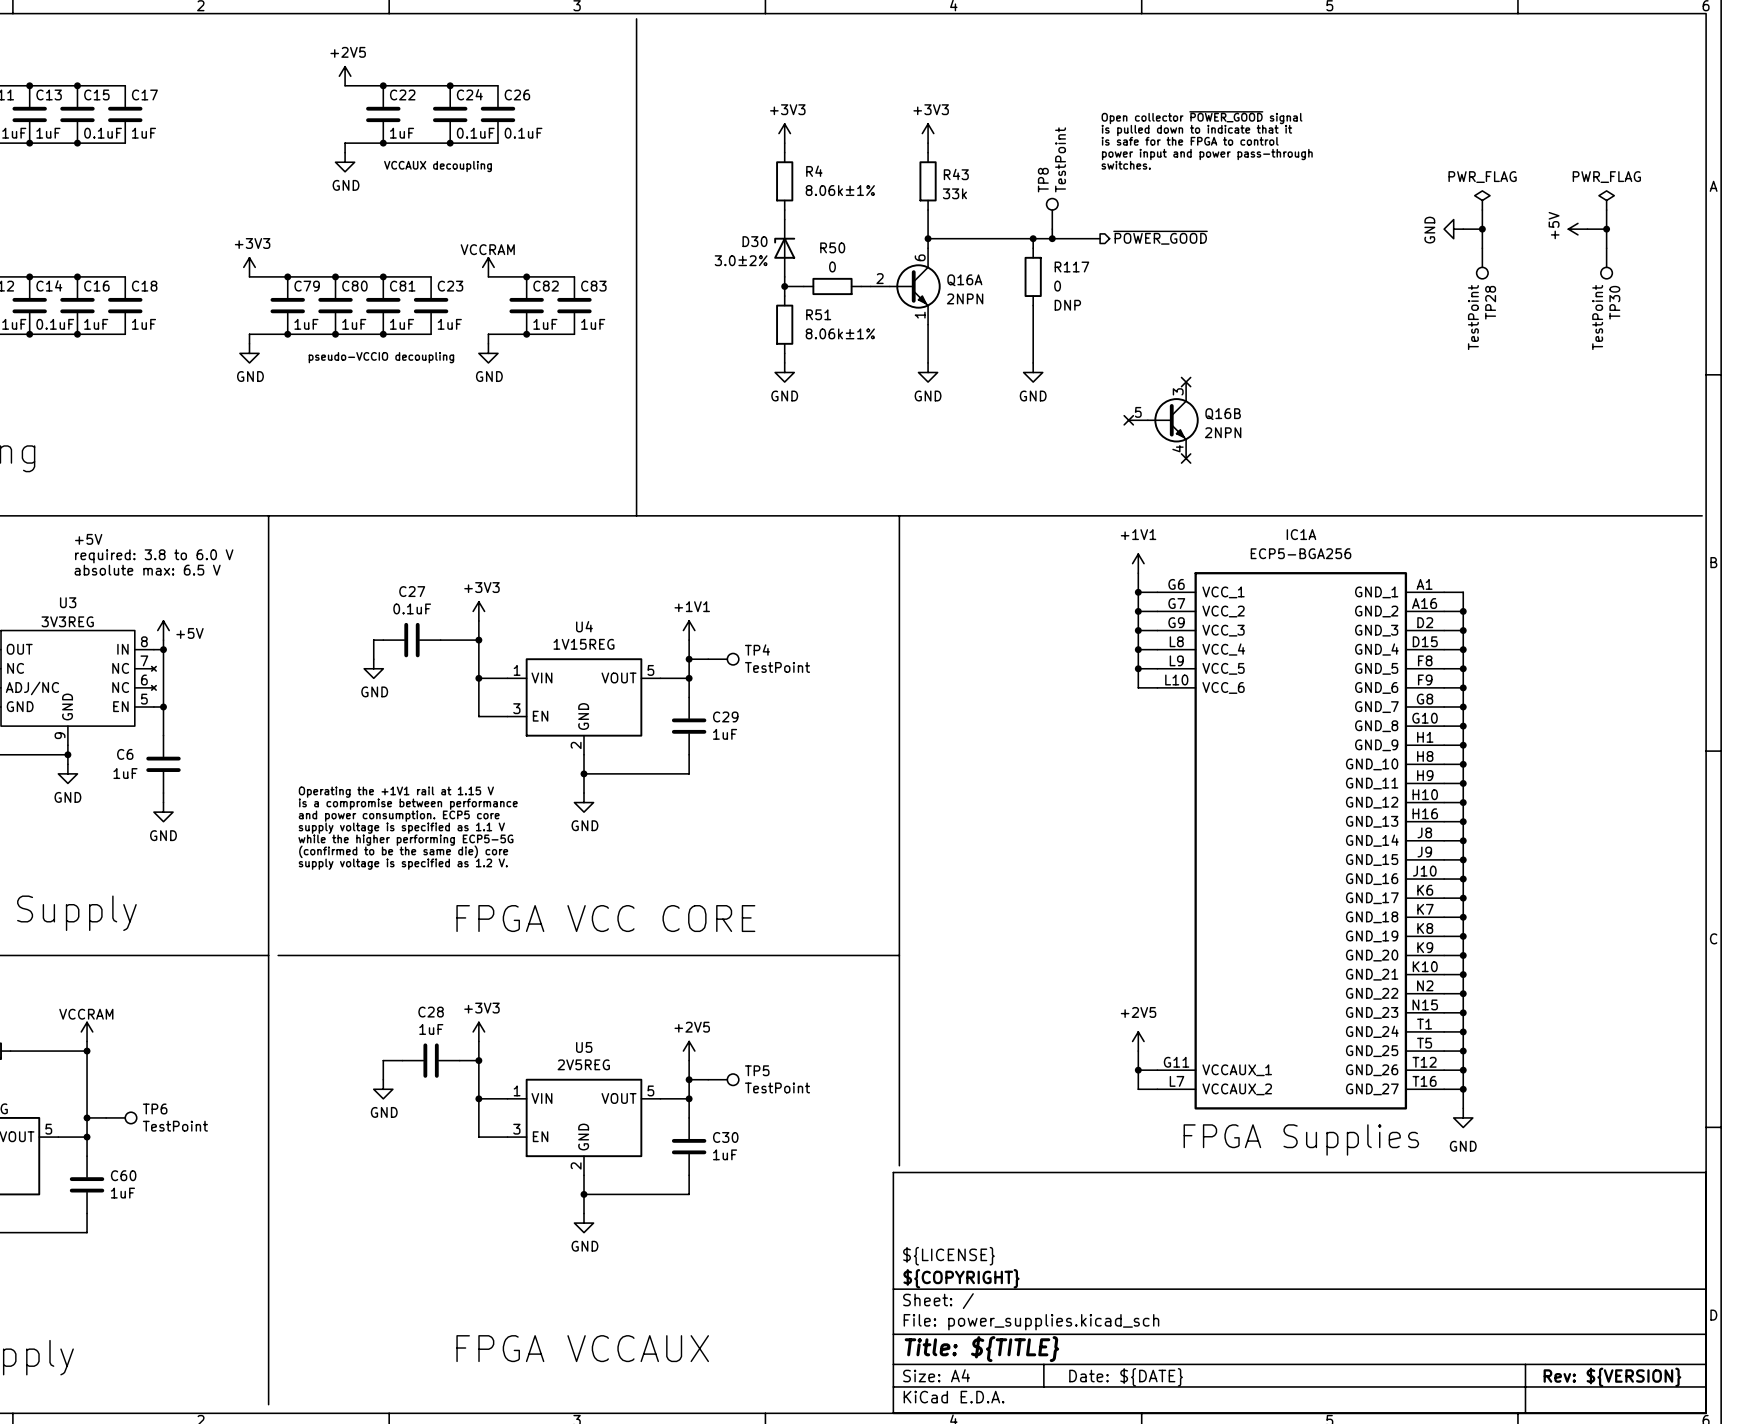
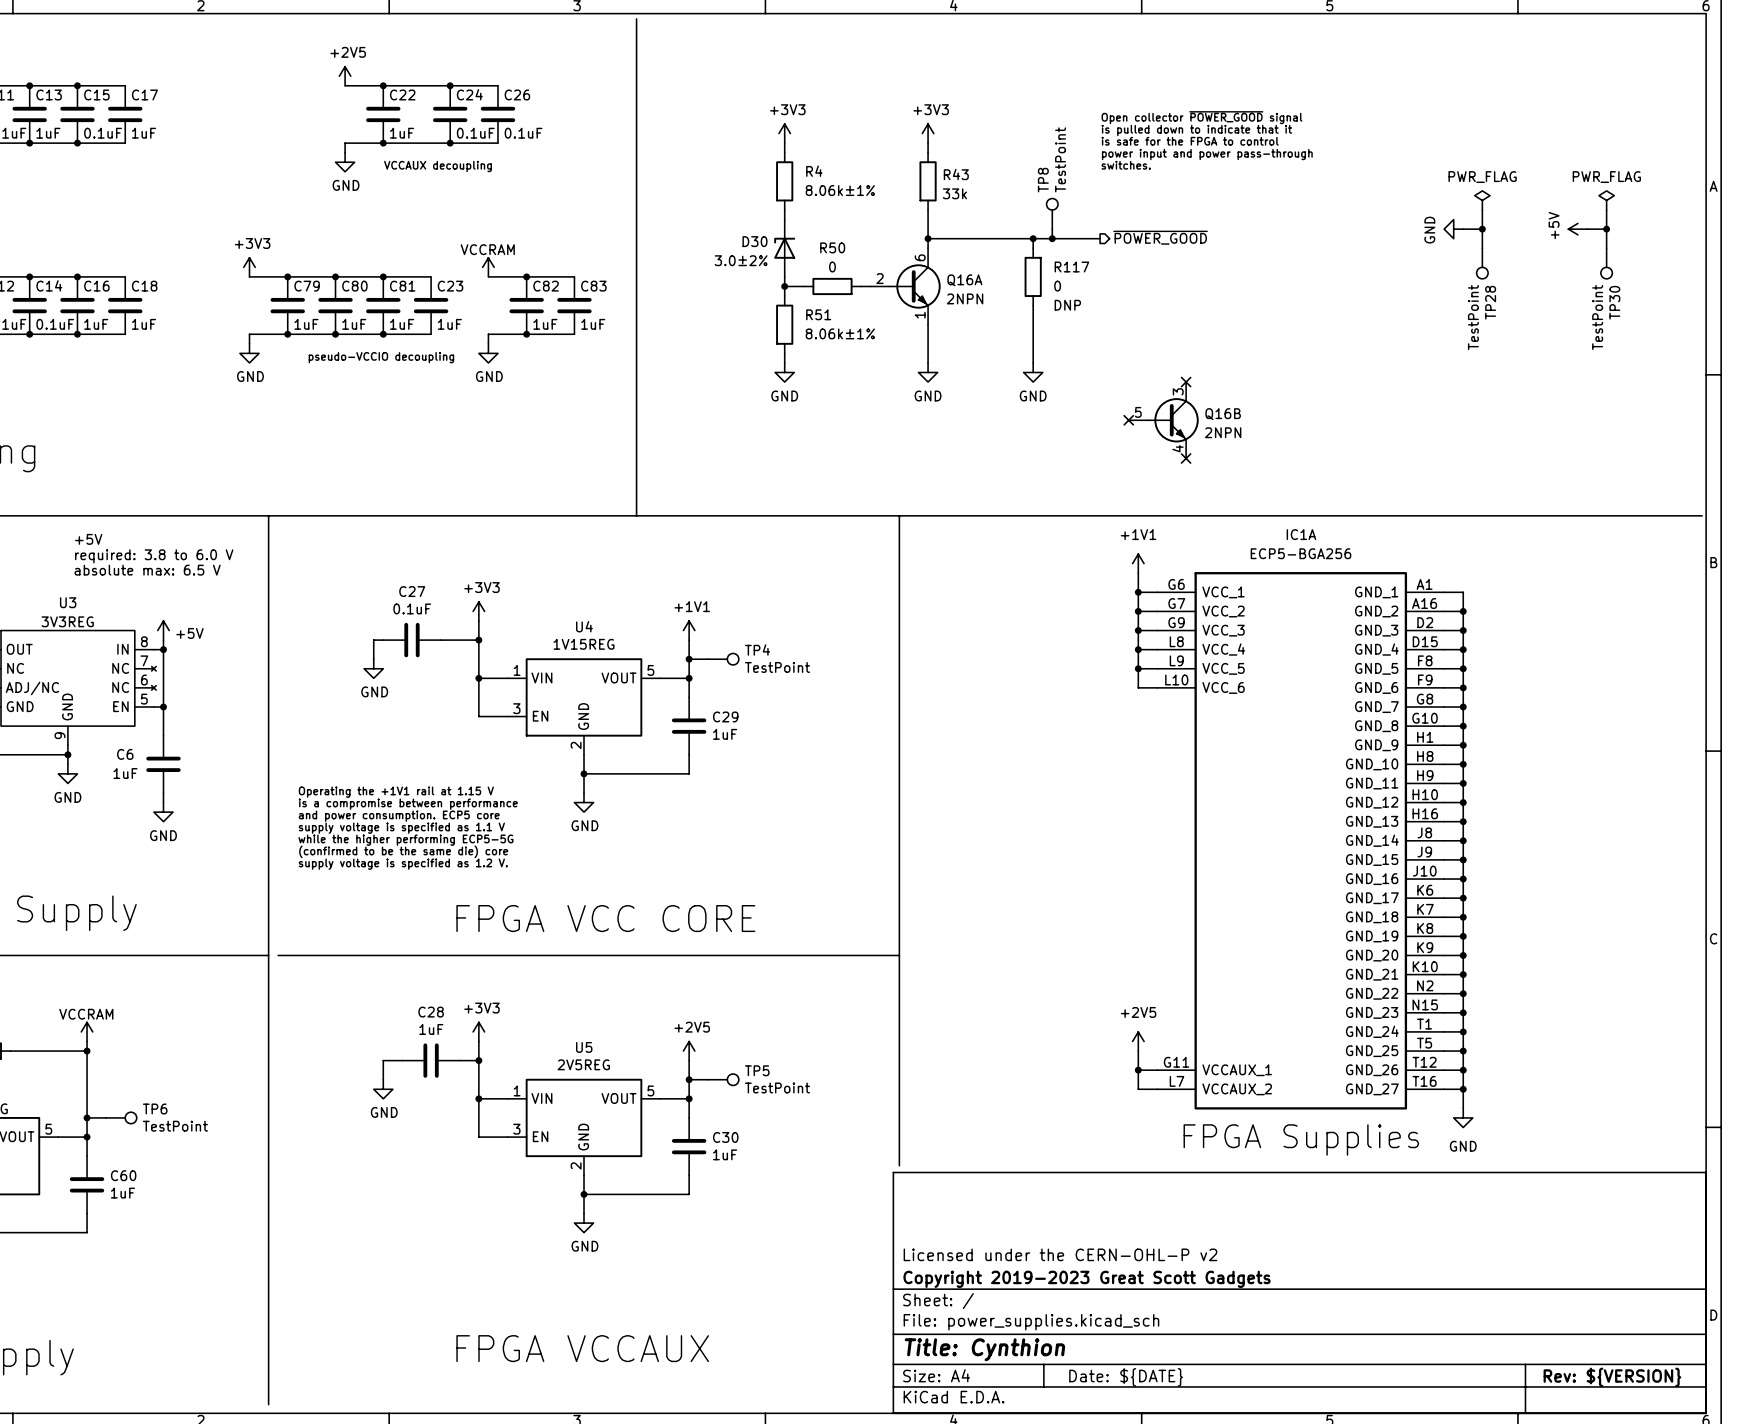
title block: ${LICENSE} (948, 1256) -> Licensed under the CERN-OHL-P v2 (1060, 1254)
title block: ${COPYRIGHT} (961, 1278) -> Copyright 2019-2023 Great Scott Gadgets (1087, 1279)
title block: Title: ${TITLE} (981, 1349) -> Title: Cynthion (984, 1349)

